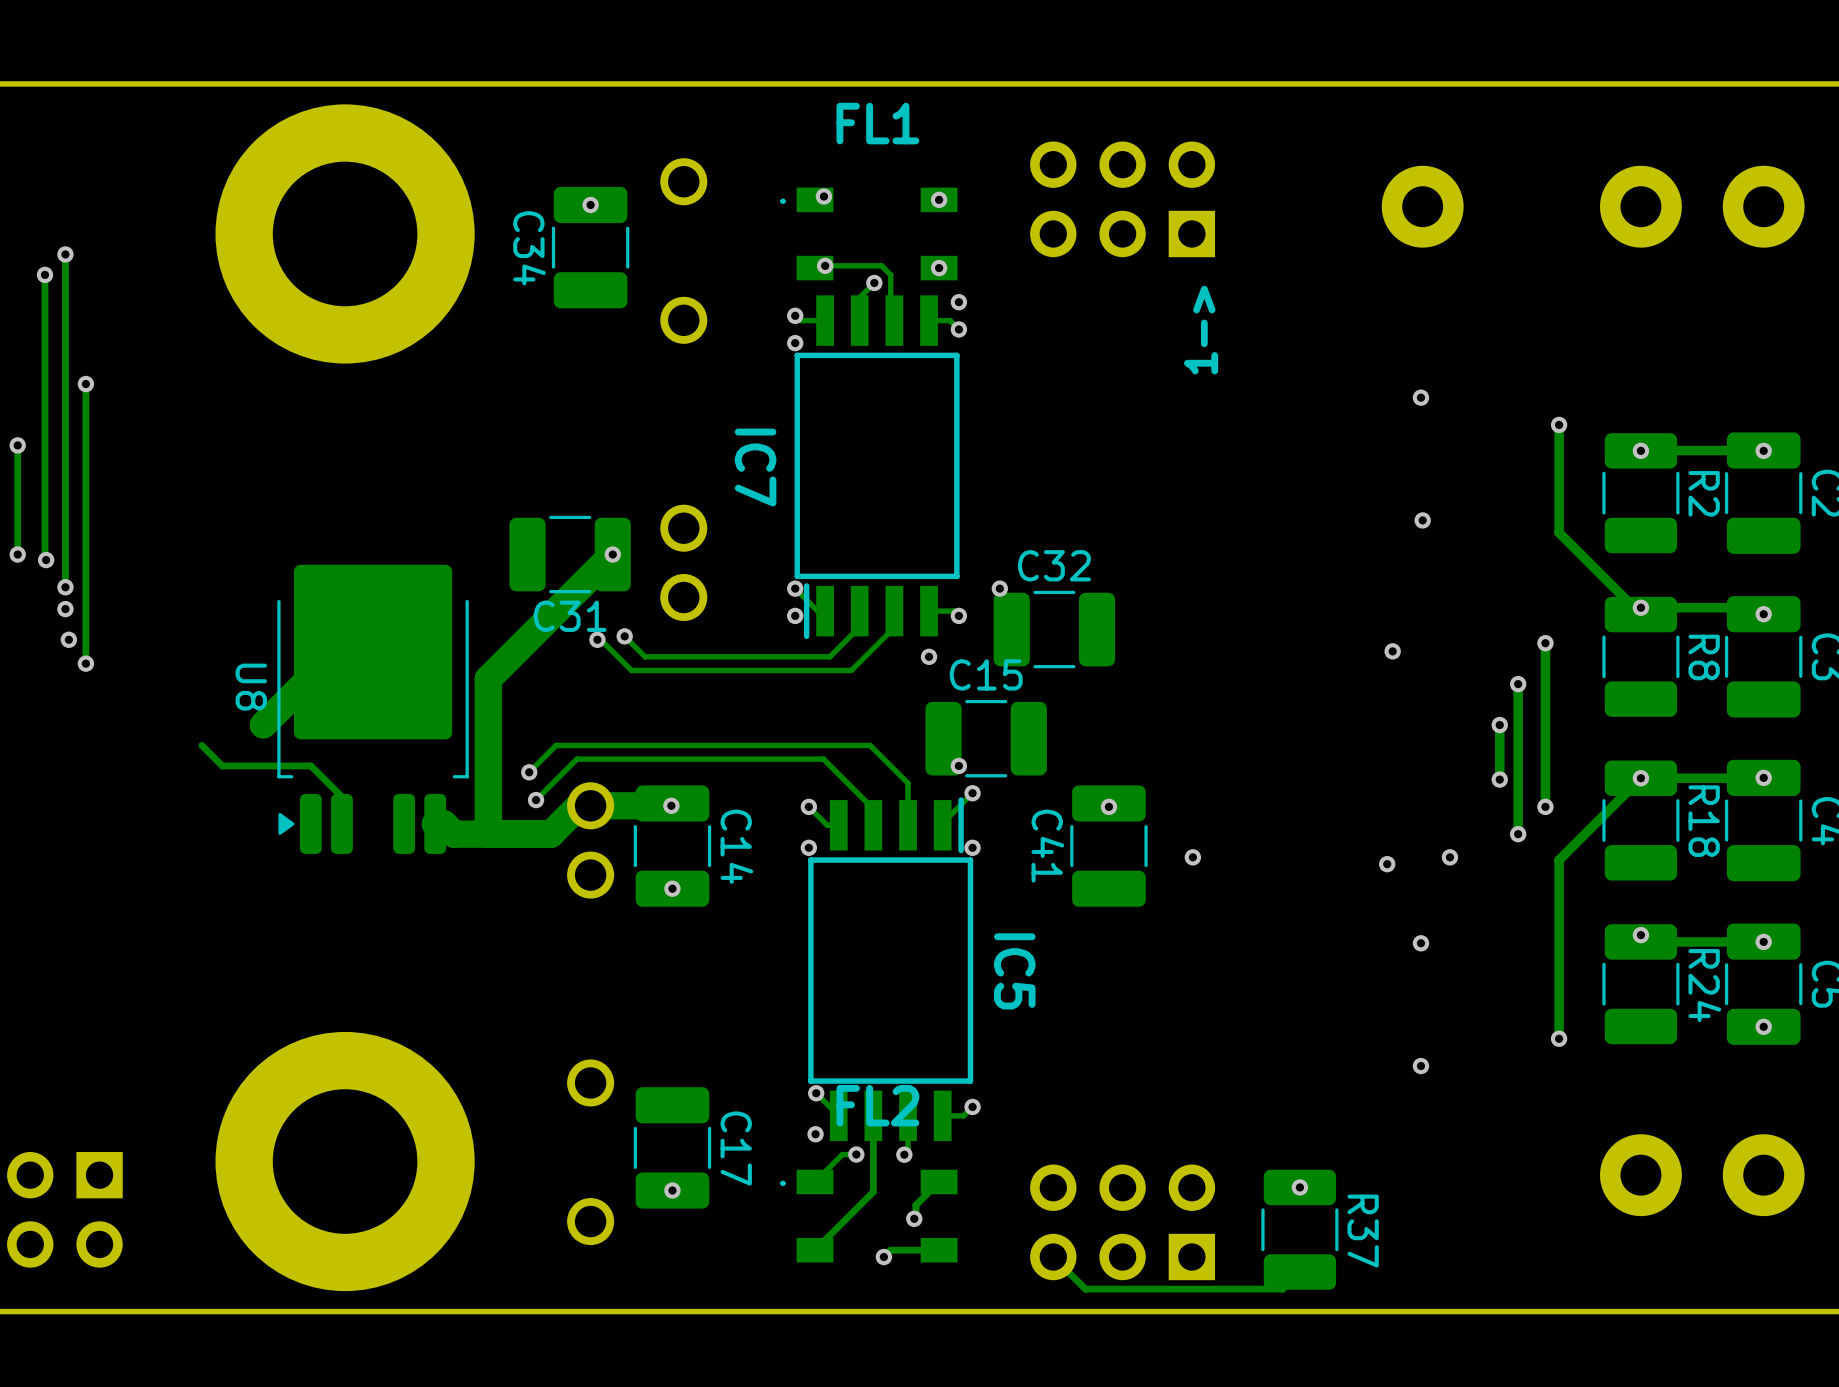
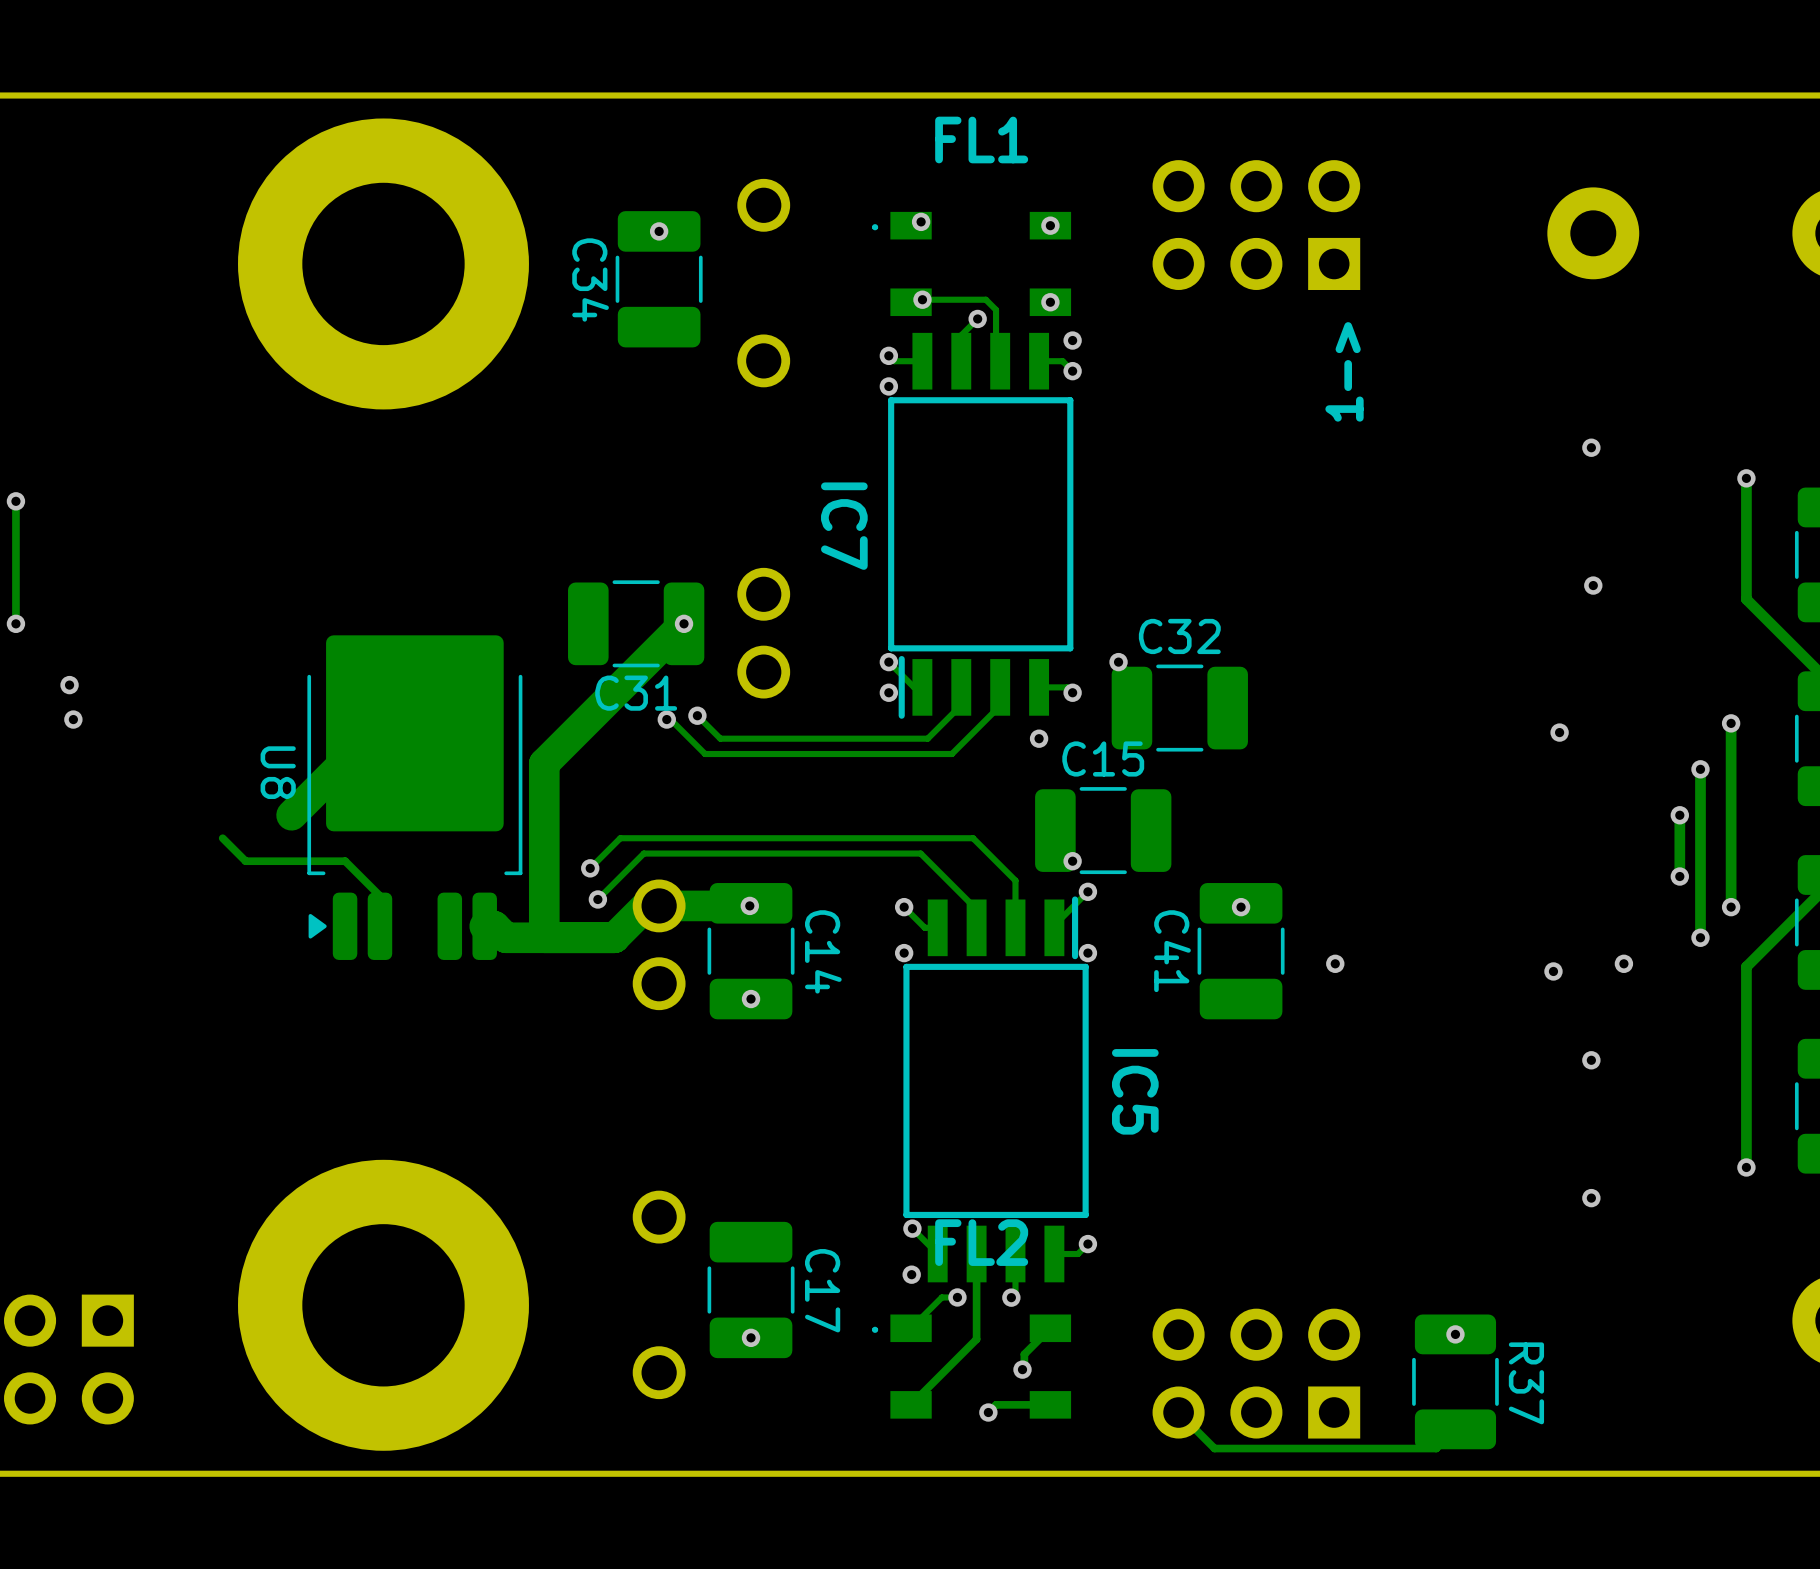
track: (65, 254) (65, 587) -> none
via: (65, 254) -> none
track: (44, 274) (46, 560) -> none
via: (44, 274) -> none
track: (85, 384) (85, 663) -> none
via: (85, 384) -> none
via: (46, 560) -> none
via: (65, 587) -> none
via: (85, 663) -> none

